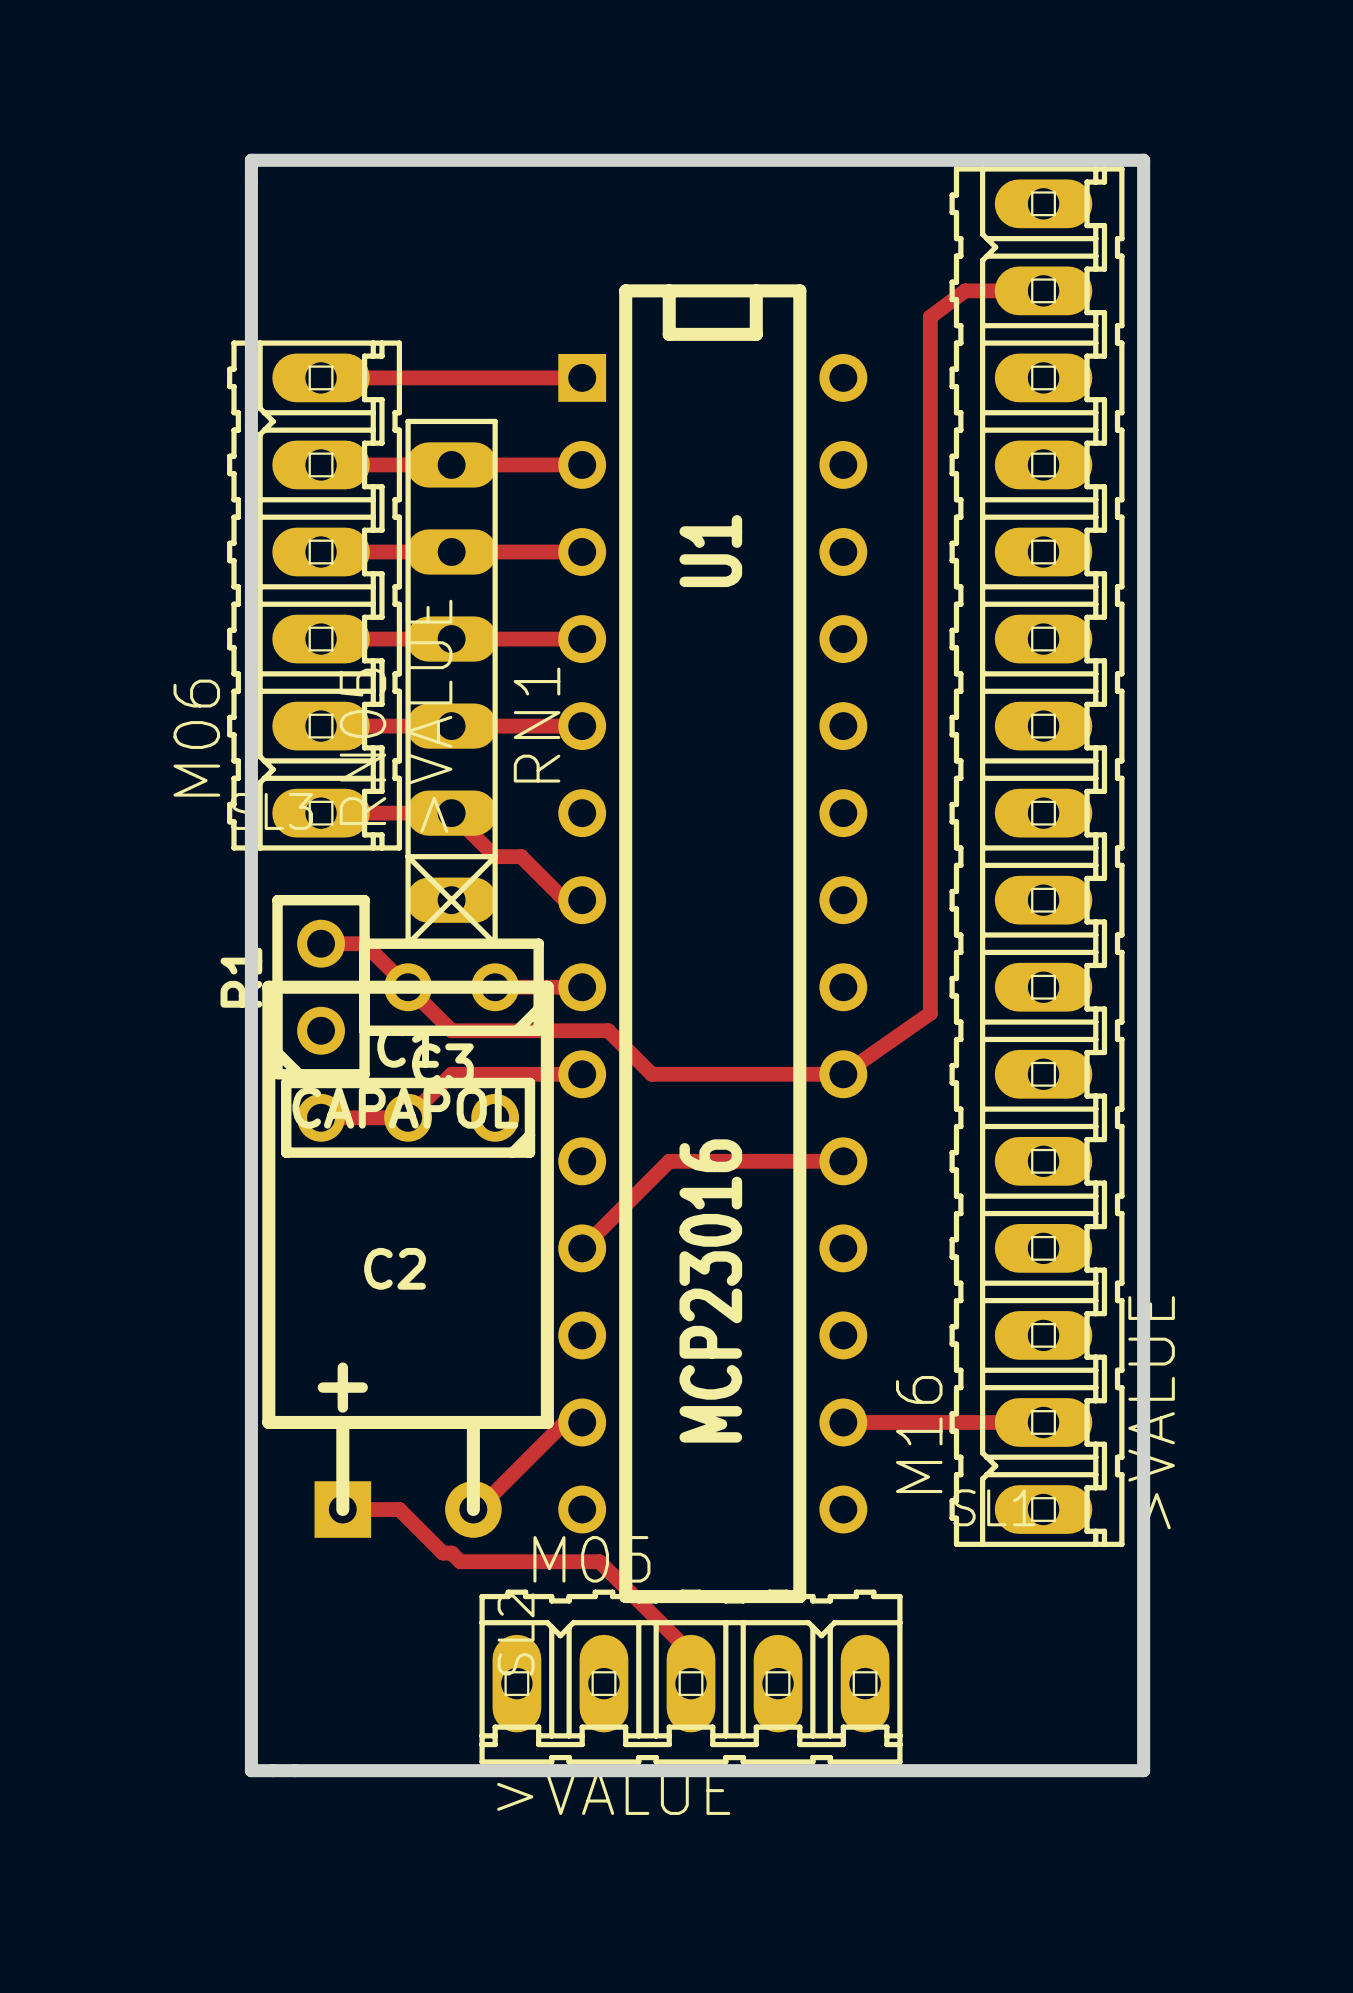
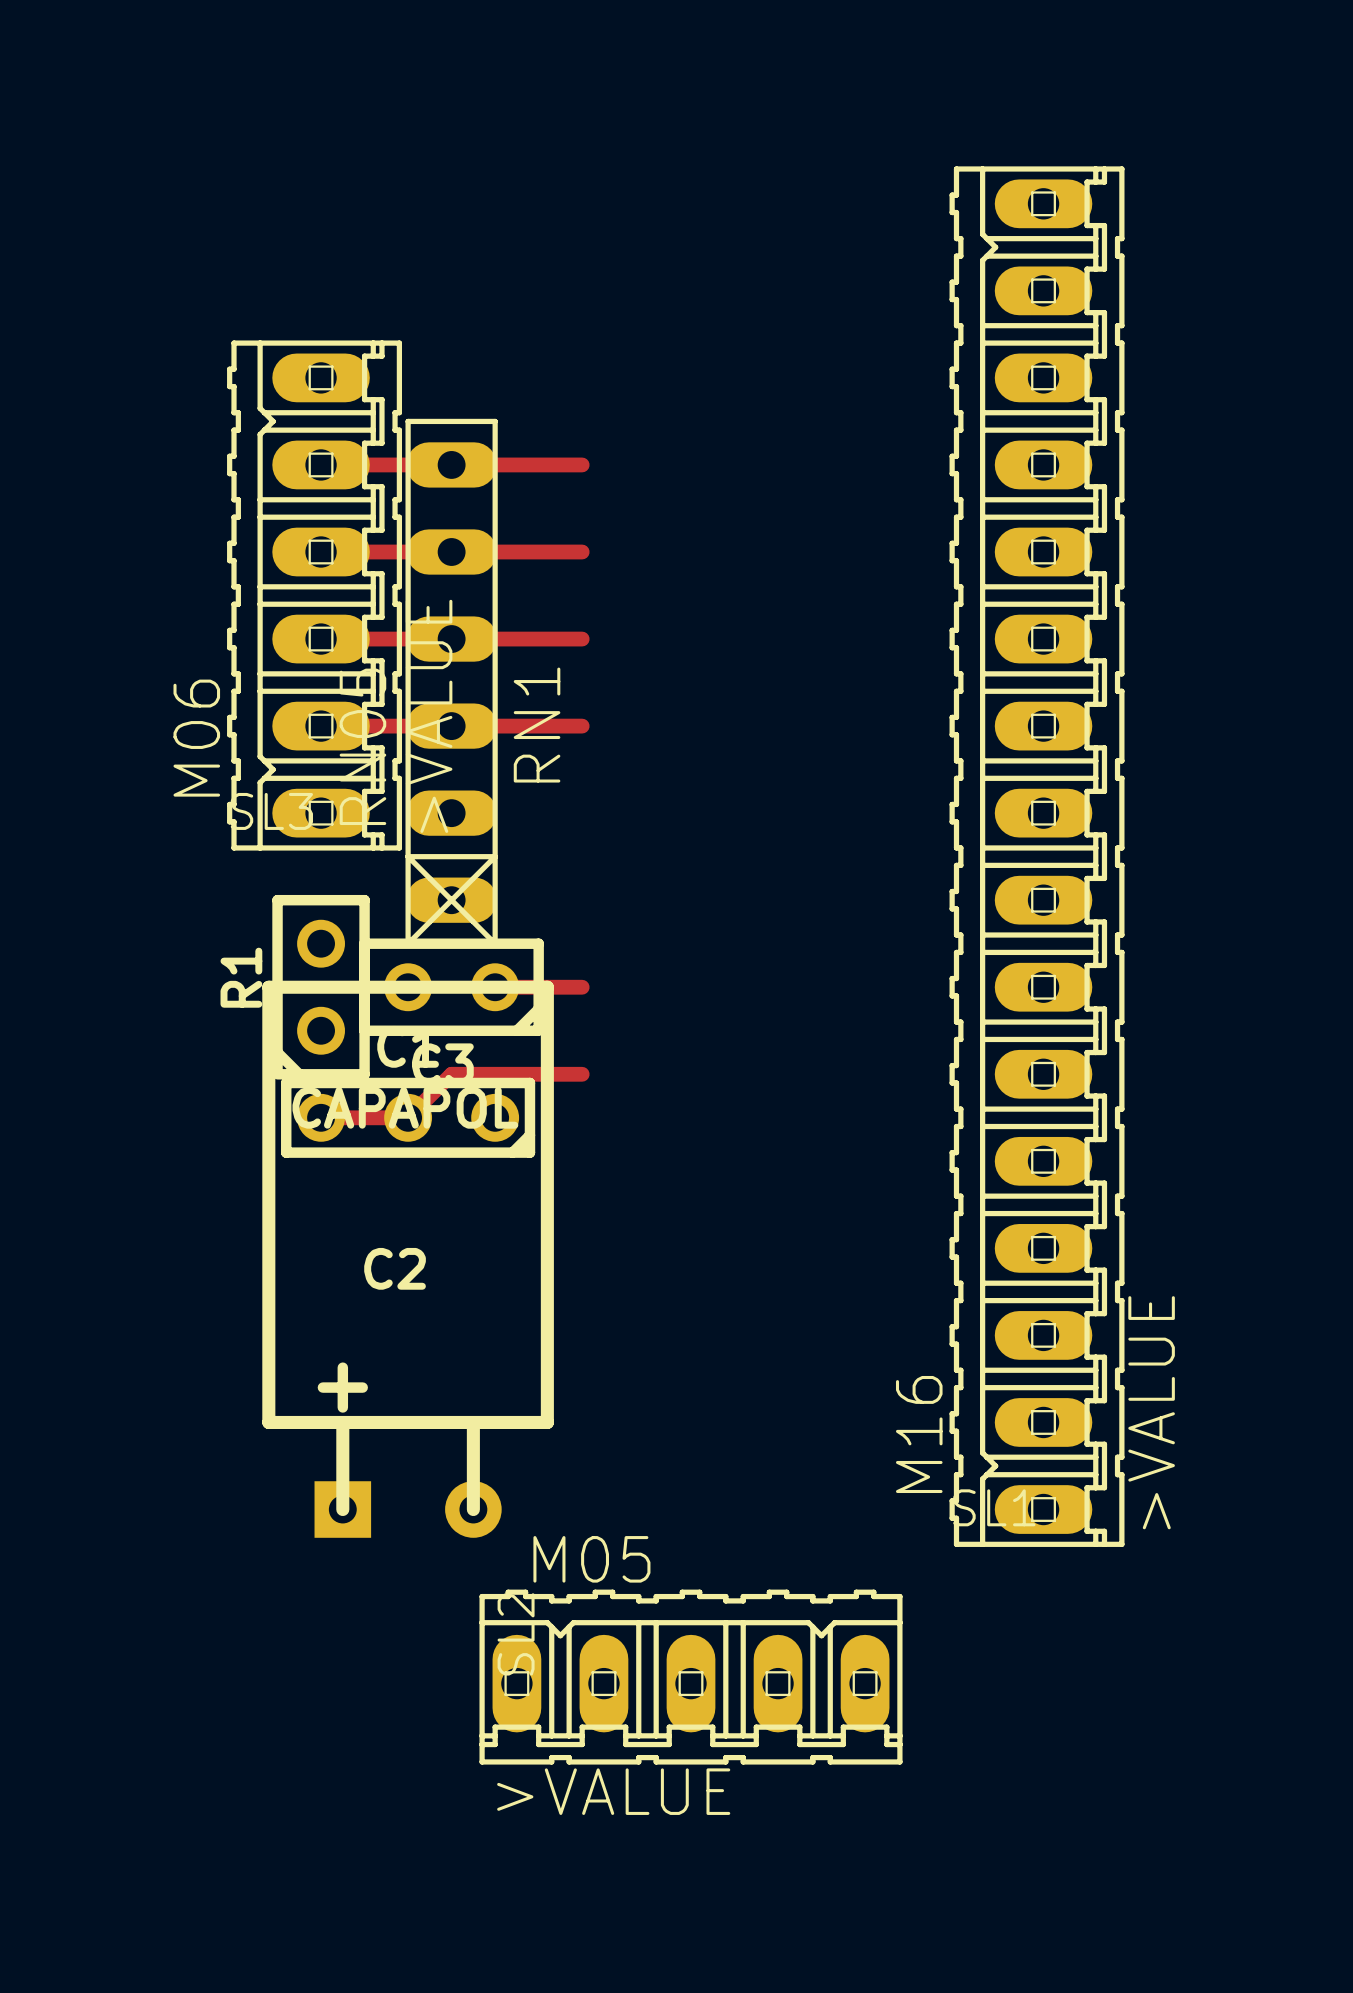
board edge: (251, 160) (1143, 160) (1143, 1770) (251, 1770) (251, 160) -> none
track: (1043, 290) (965, 290) (930, 316) (930, 1013) (843, 1074) (651, 1074) (608, 1030) (451, 1030) (364, 943) (321, 943) -> none
track: (321, 377) (582, 377) -> none
track: (321, 813) (451, 813) (495, 856) (521, 856) (564, 900) (582, 900) -> none
U1: MCP23016 (712, 943) -> none
track: (843, 1161) (669, 1161) (582, 1248) -> none
track: (582, 1422) (564, 1422) (477, 1509) (473, 1509) -> none
track: (843, 1422) (1043, 1422) -> none
track: (342, 1509) (399, 1509) (442, 1553) (451, 1553) (460, 1561) (599, 1561) (695, 1657) (695, 1683) (691, 1683) -> none

